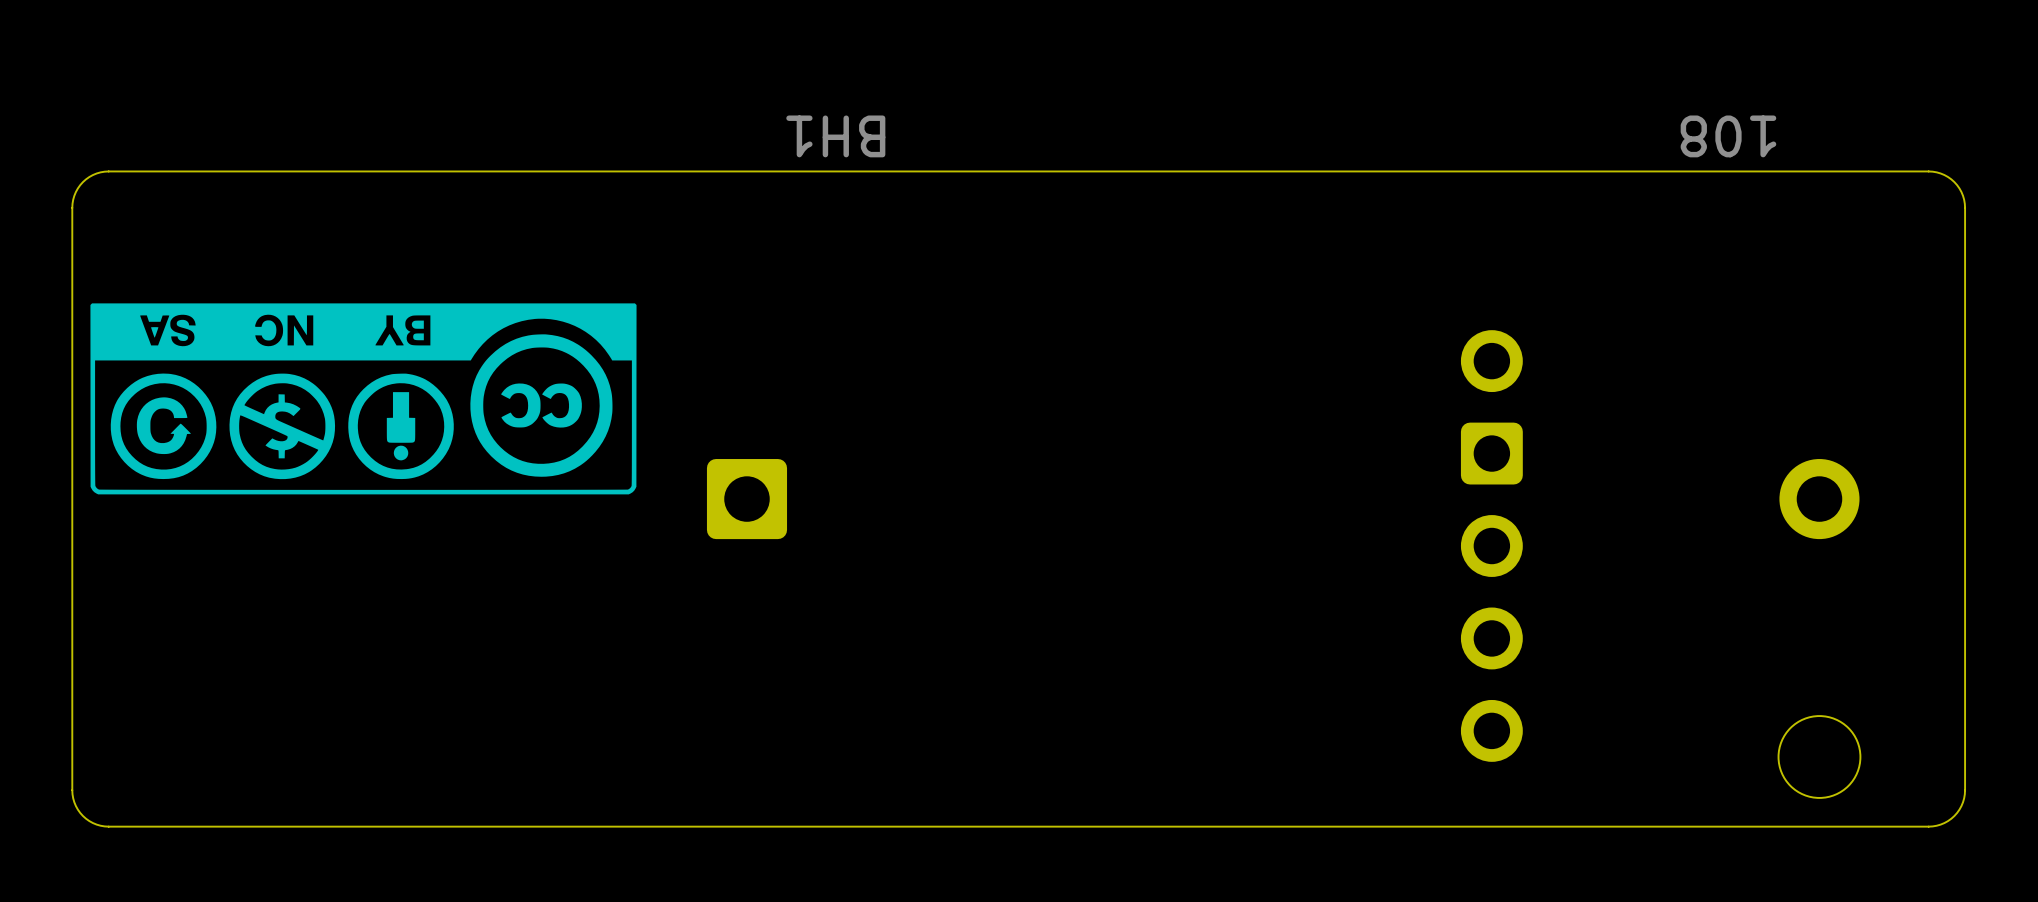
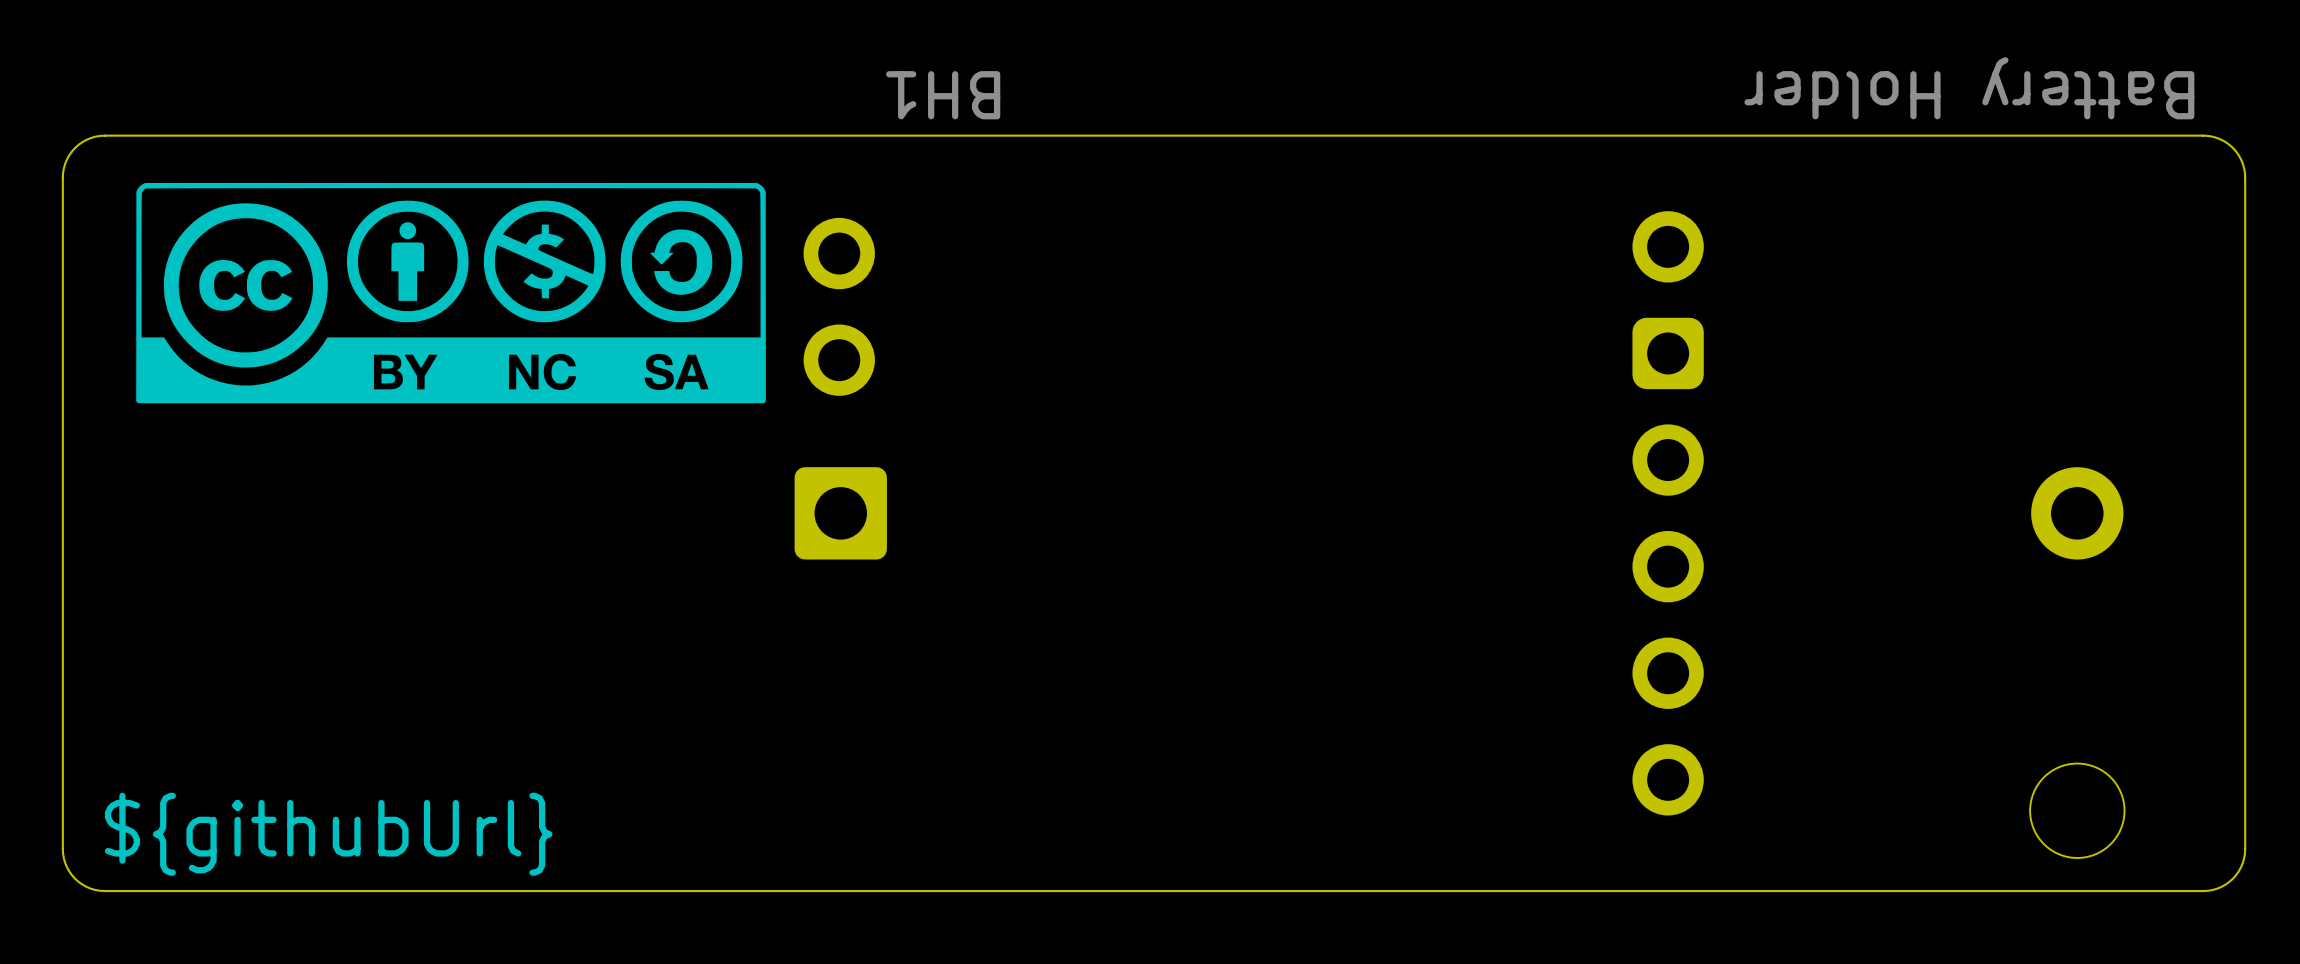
BH1 value: 108 (1728, 136) -> Battery Holder (1969, 88)
drawing: none -> [136, 182, 766, 404]
drawing: [90, 303, 637, 495] -> none
part: none -> (839, 306)
part: none -> (1668, 513)
part: (1491, 546) -> none
text: none -> ${githubUrl} (328, 834)

